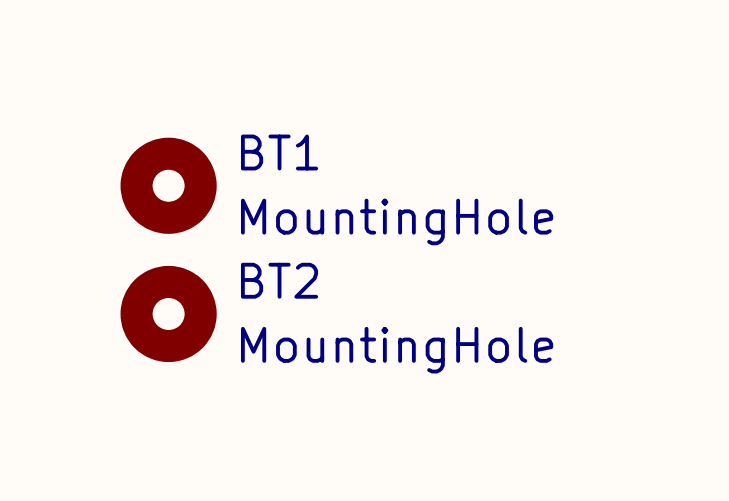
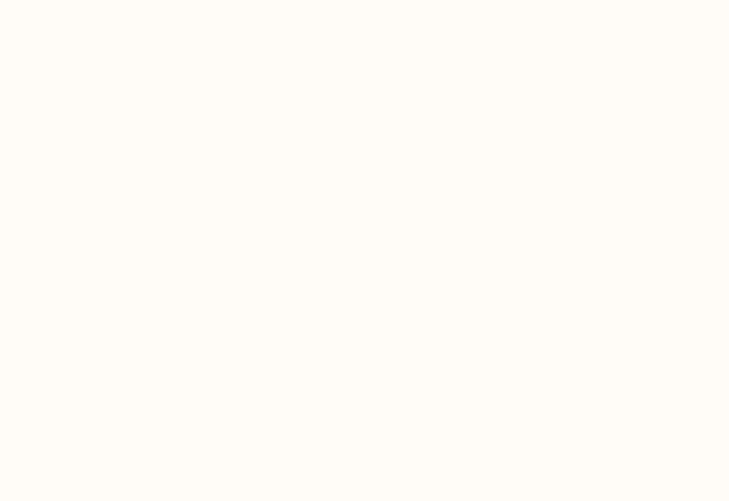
BT1: MountingHole (168, 185) -> none
BT2: MountingHole (168, 313) -> none

